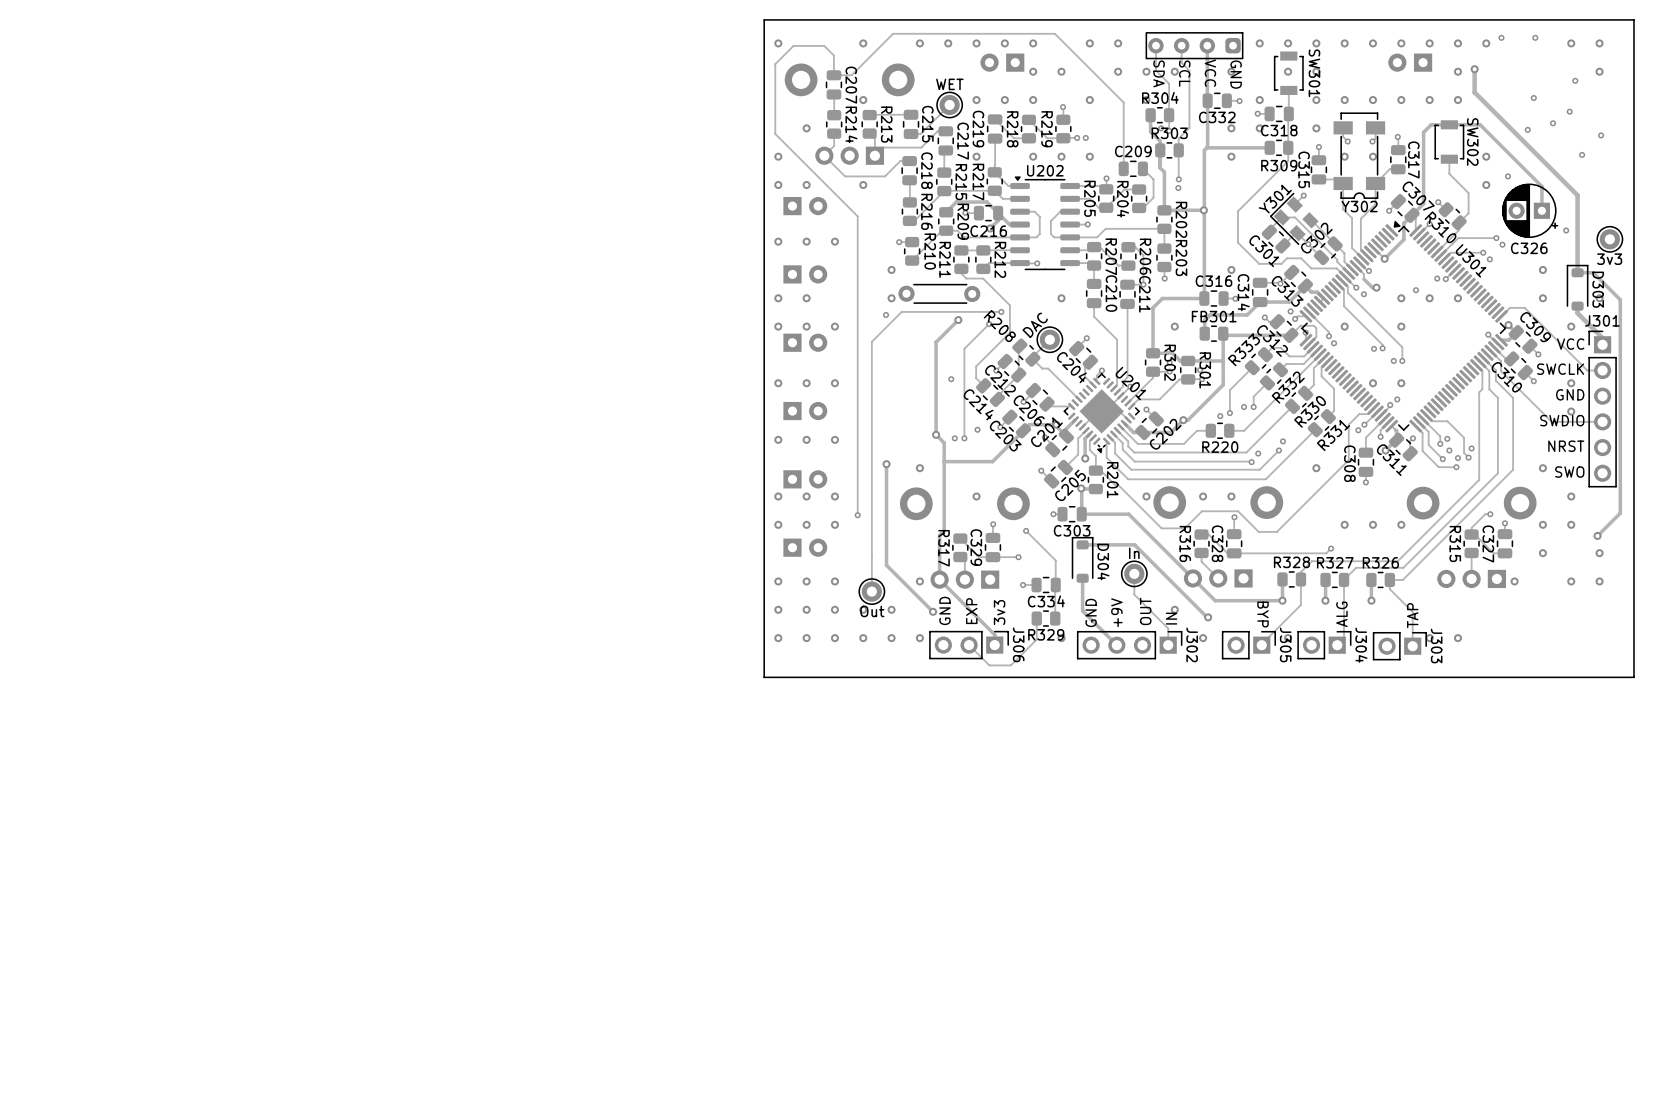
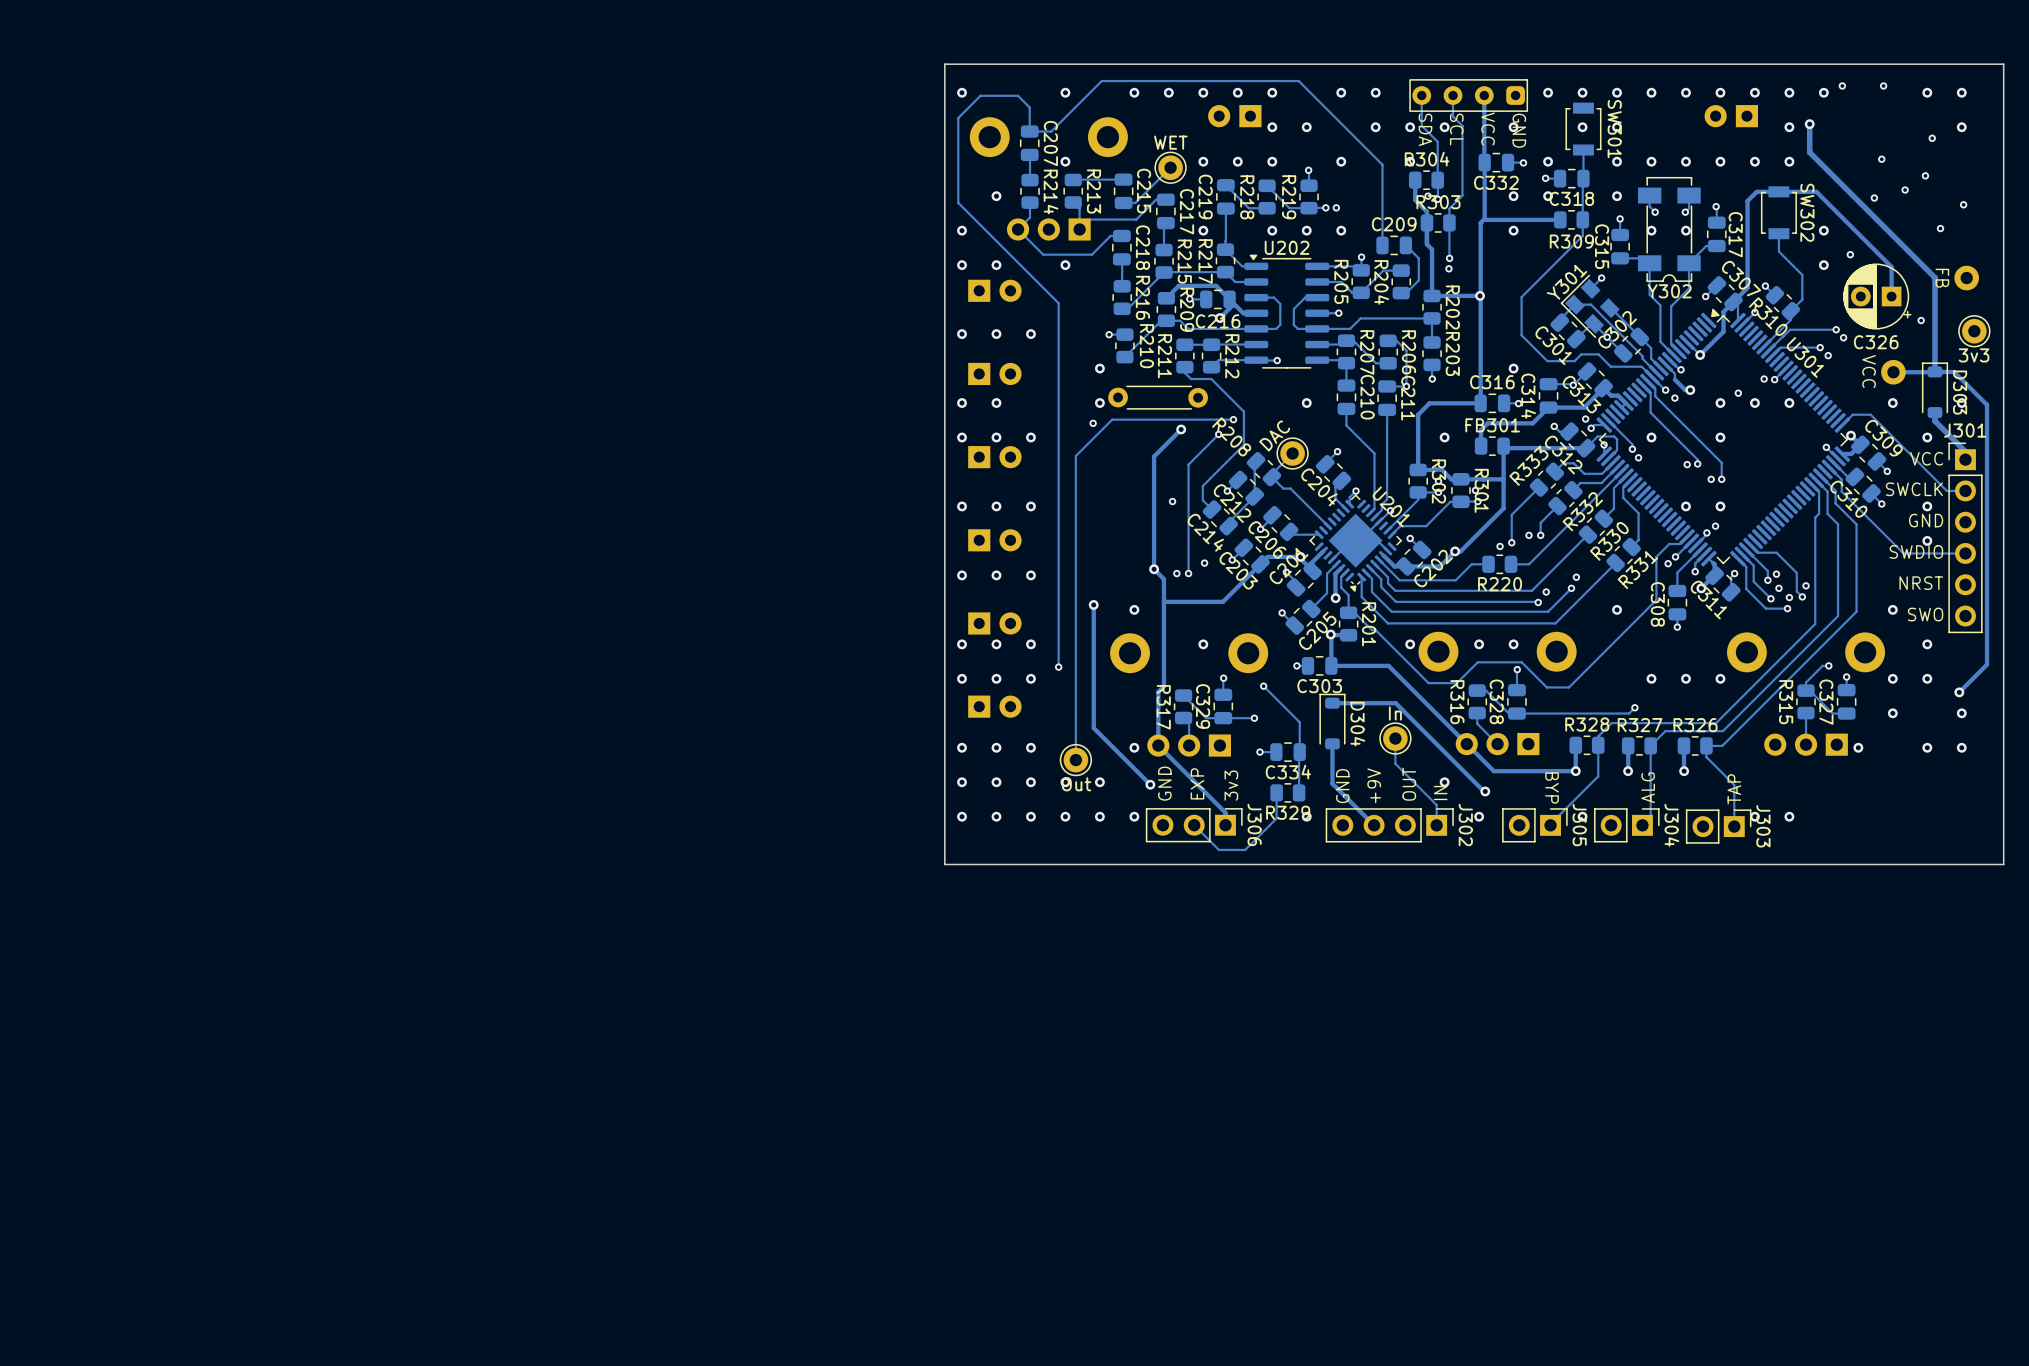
part: none -> FB (1966, 278)
via: (1542, 269) -> none
part: none -> VCC (1893, 372)
track: none -> (1935, 371) (1893, 372)

